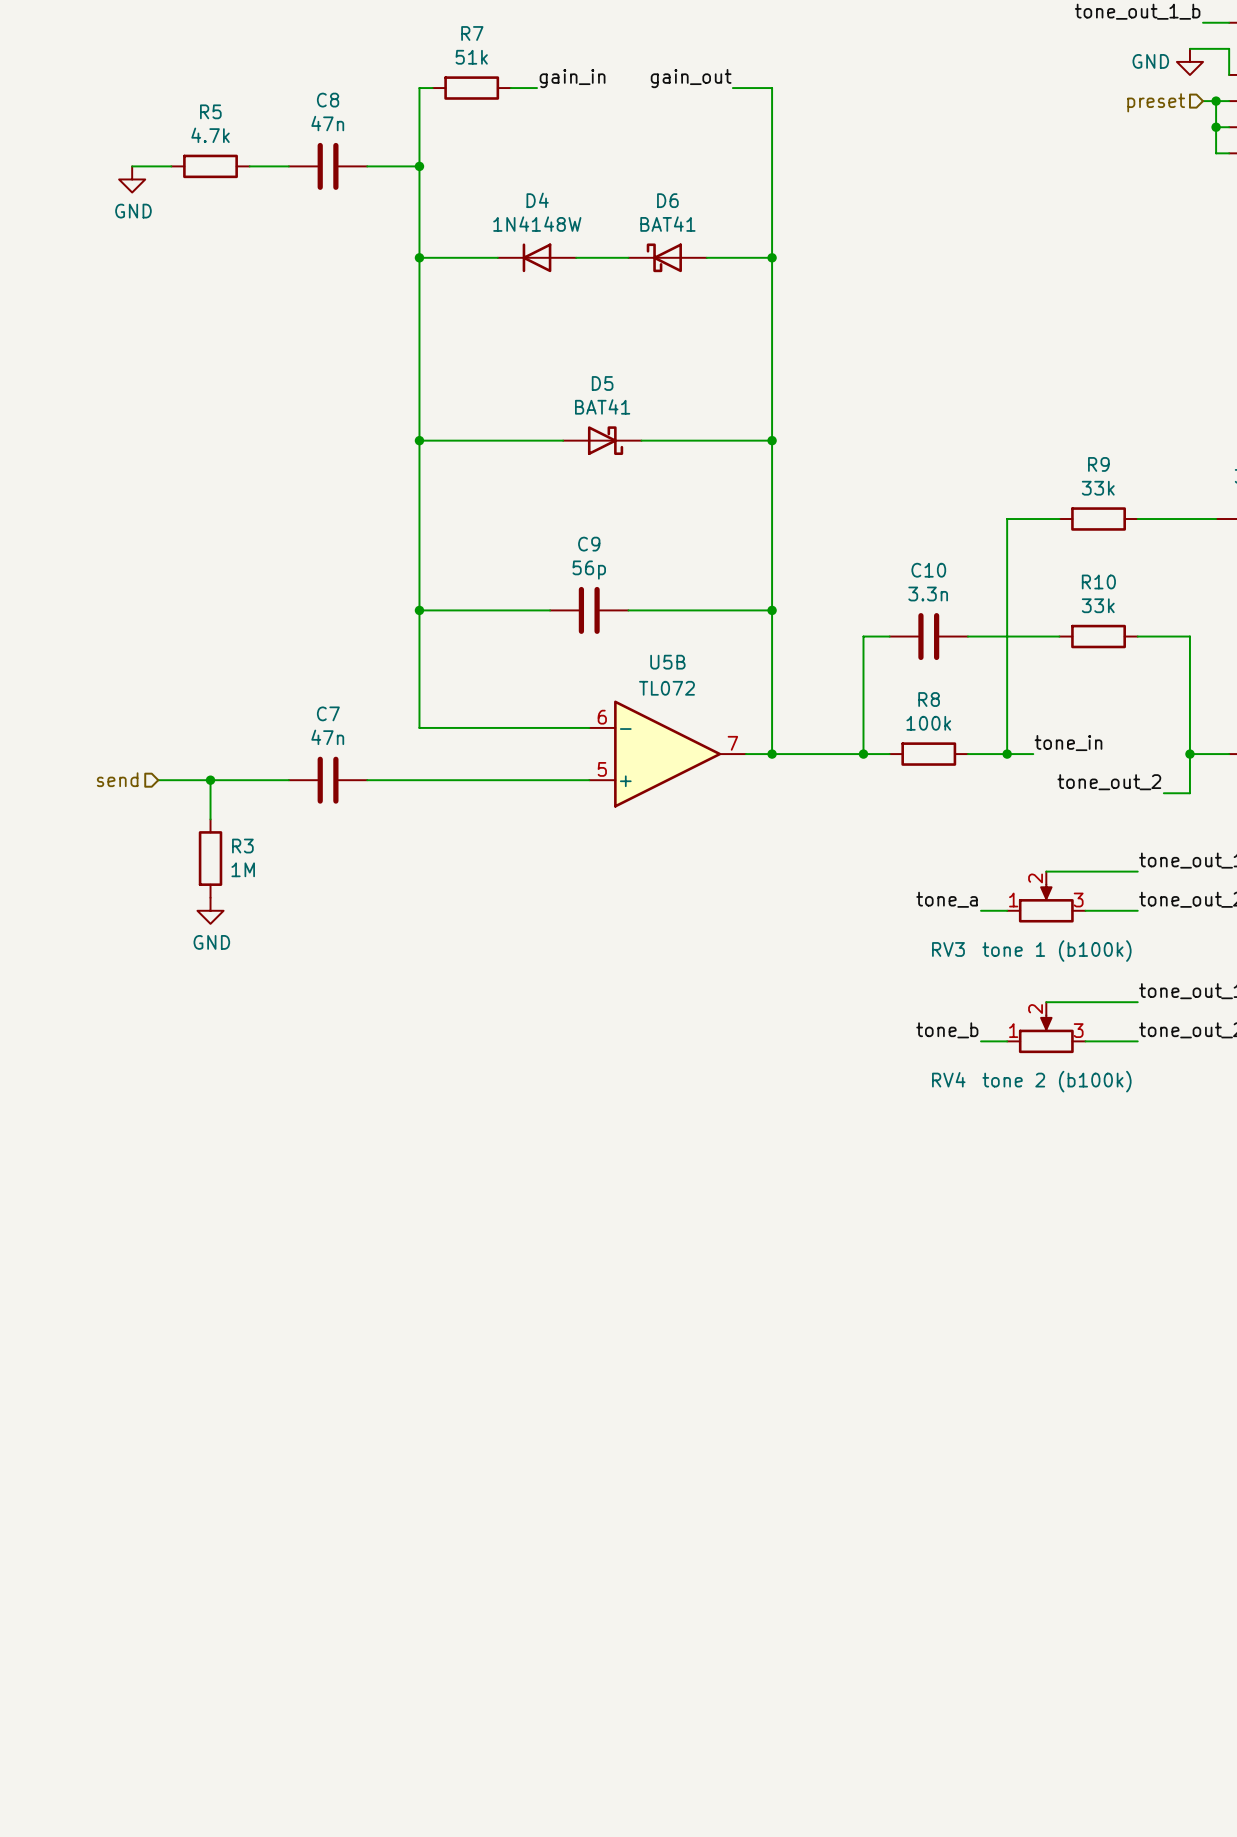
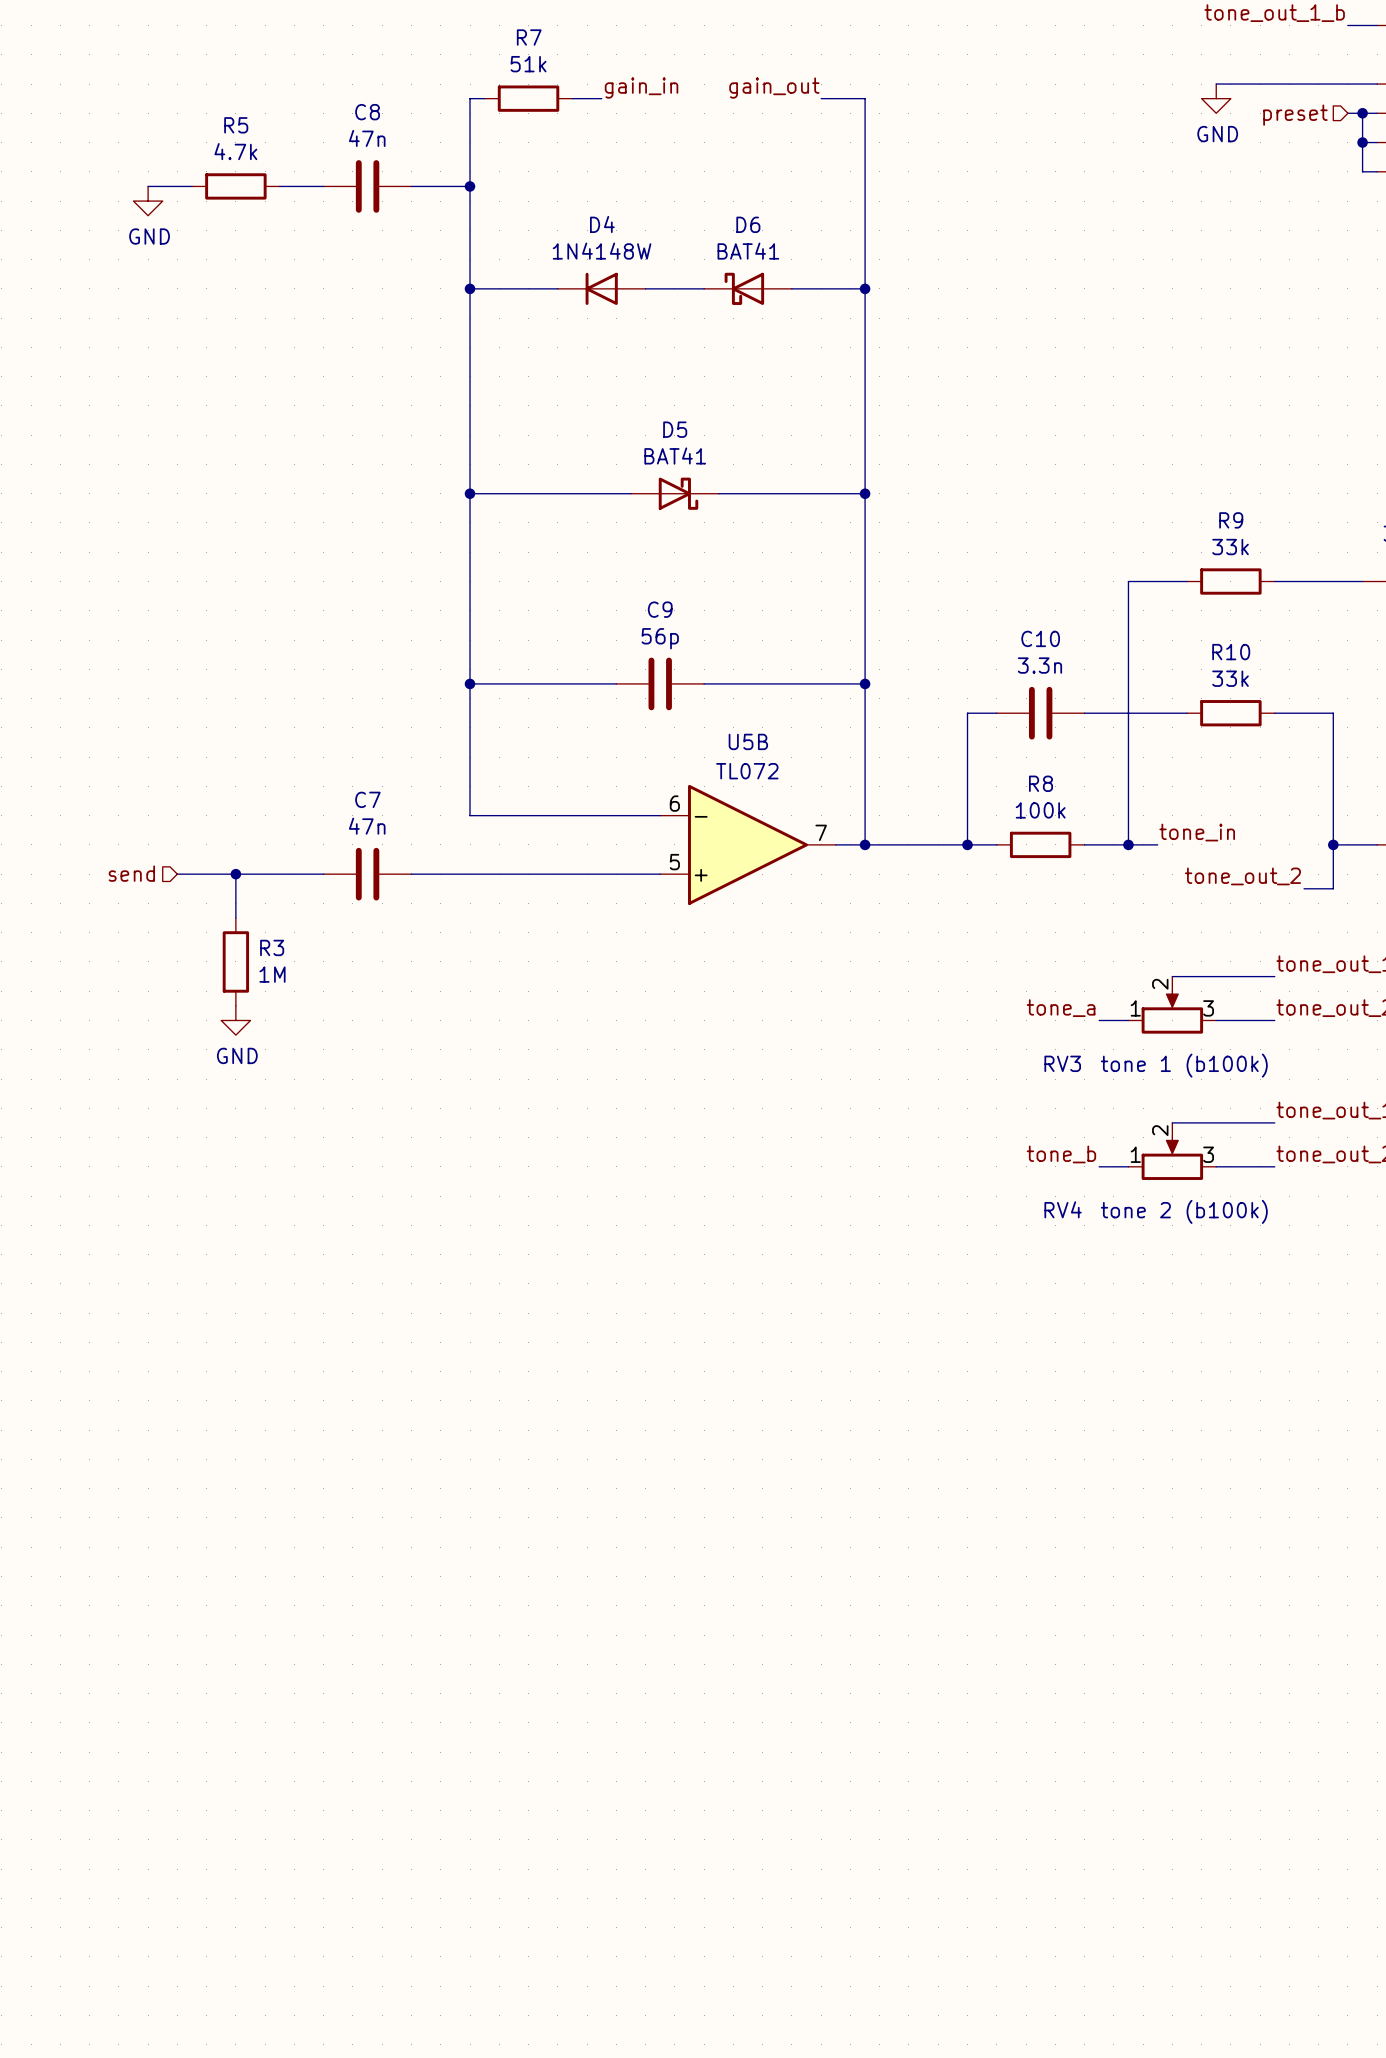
wire: (1189, 48) (1229, 48) (1229, 74) -> (1216, 84) (1377, 84)
power symbol text position: GND (1150, 61) -> GND (1217, 134)
power symbol position: GND (1189, 61) -> GND (1216, 98)

